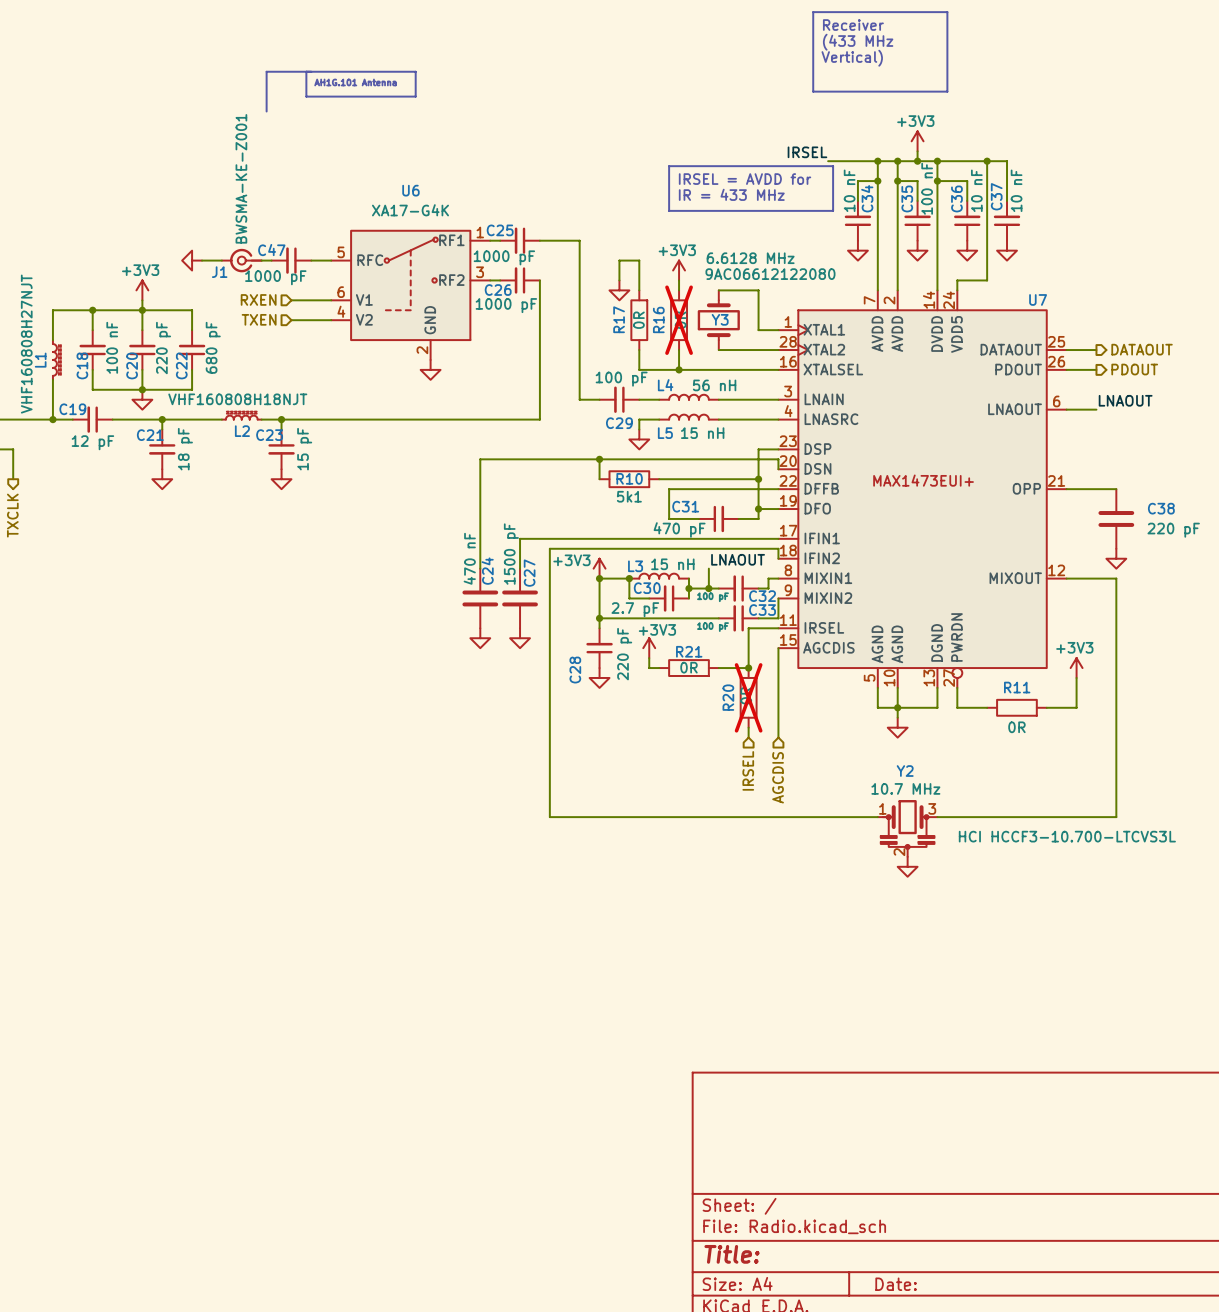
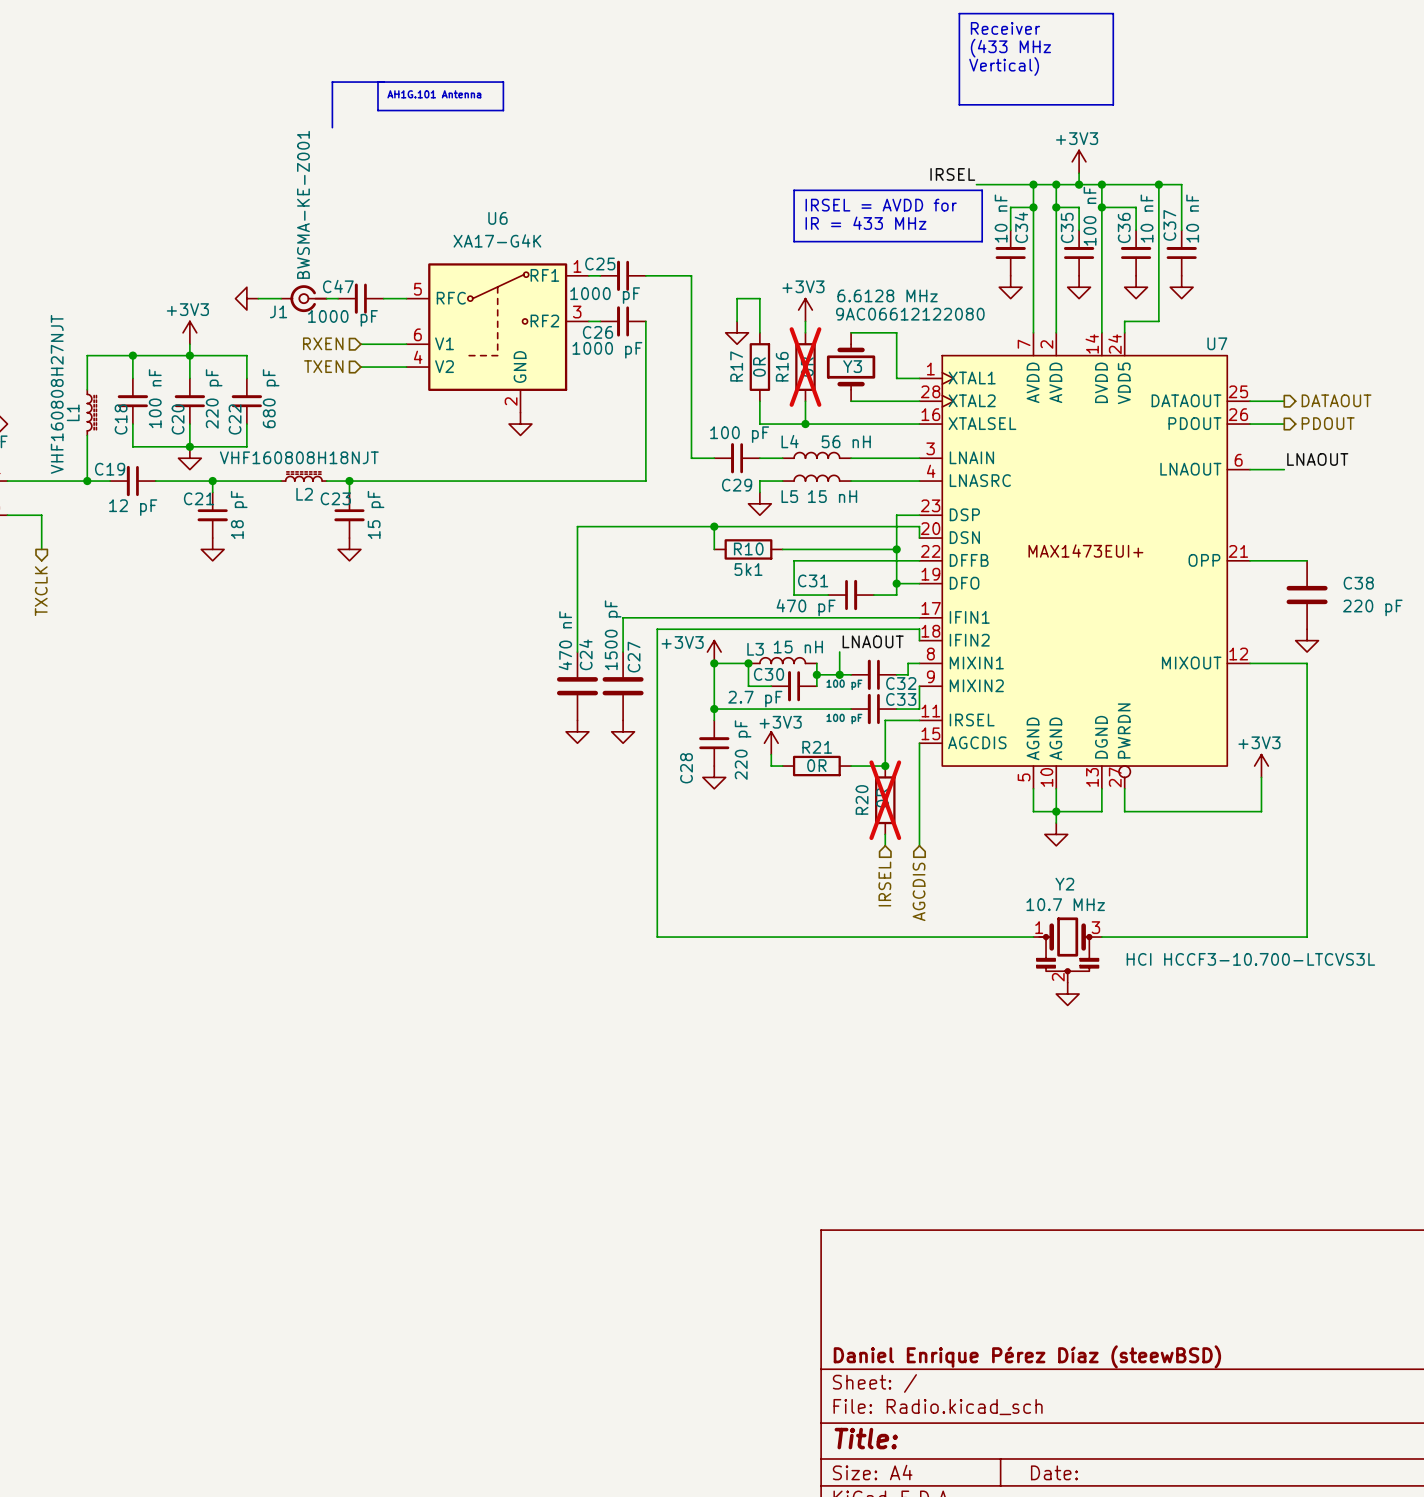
wire: none -> (1158, 811) (1227, 811)
R11: 0R (1016, 707) -> none
title block: none -> Daniel Enrique Pérez Díaz (steewBSD) (1027, 1356)

